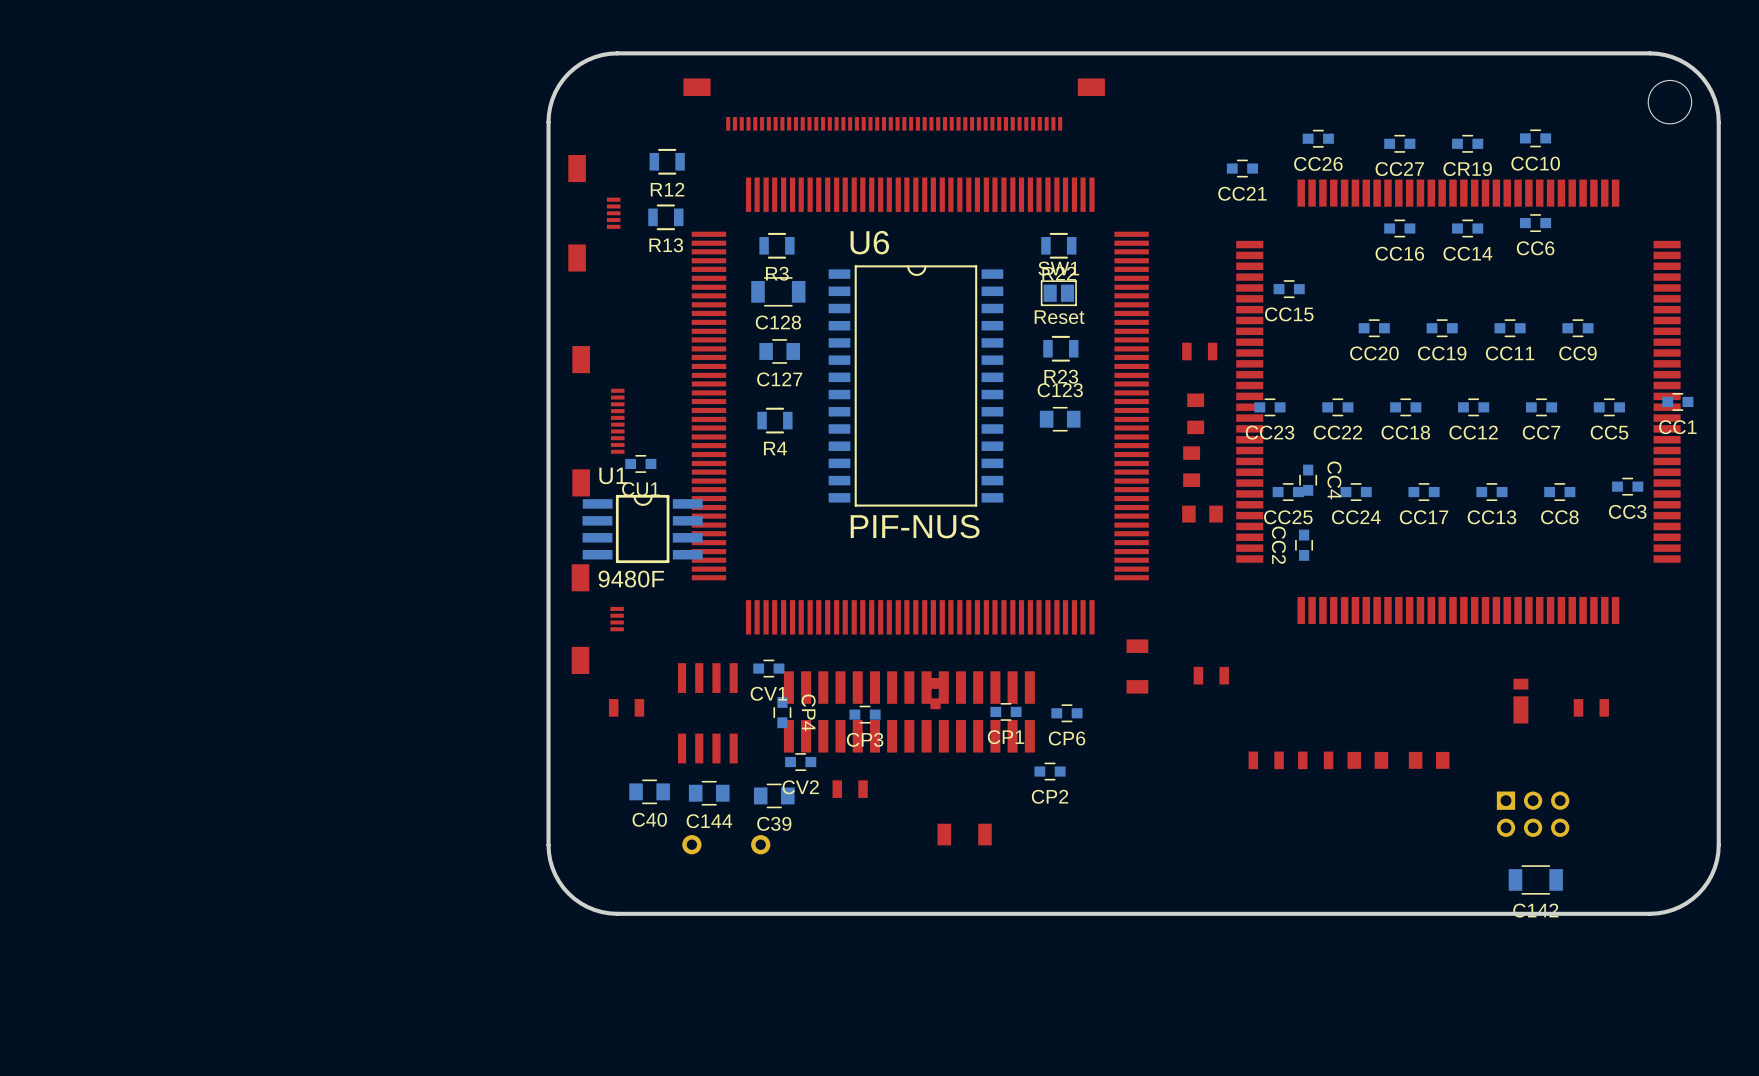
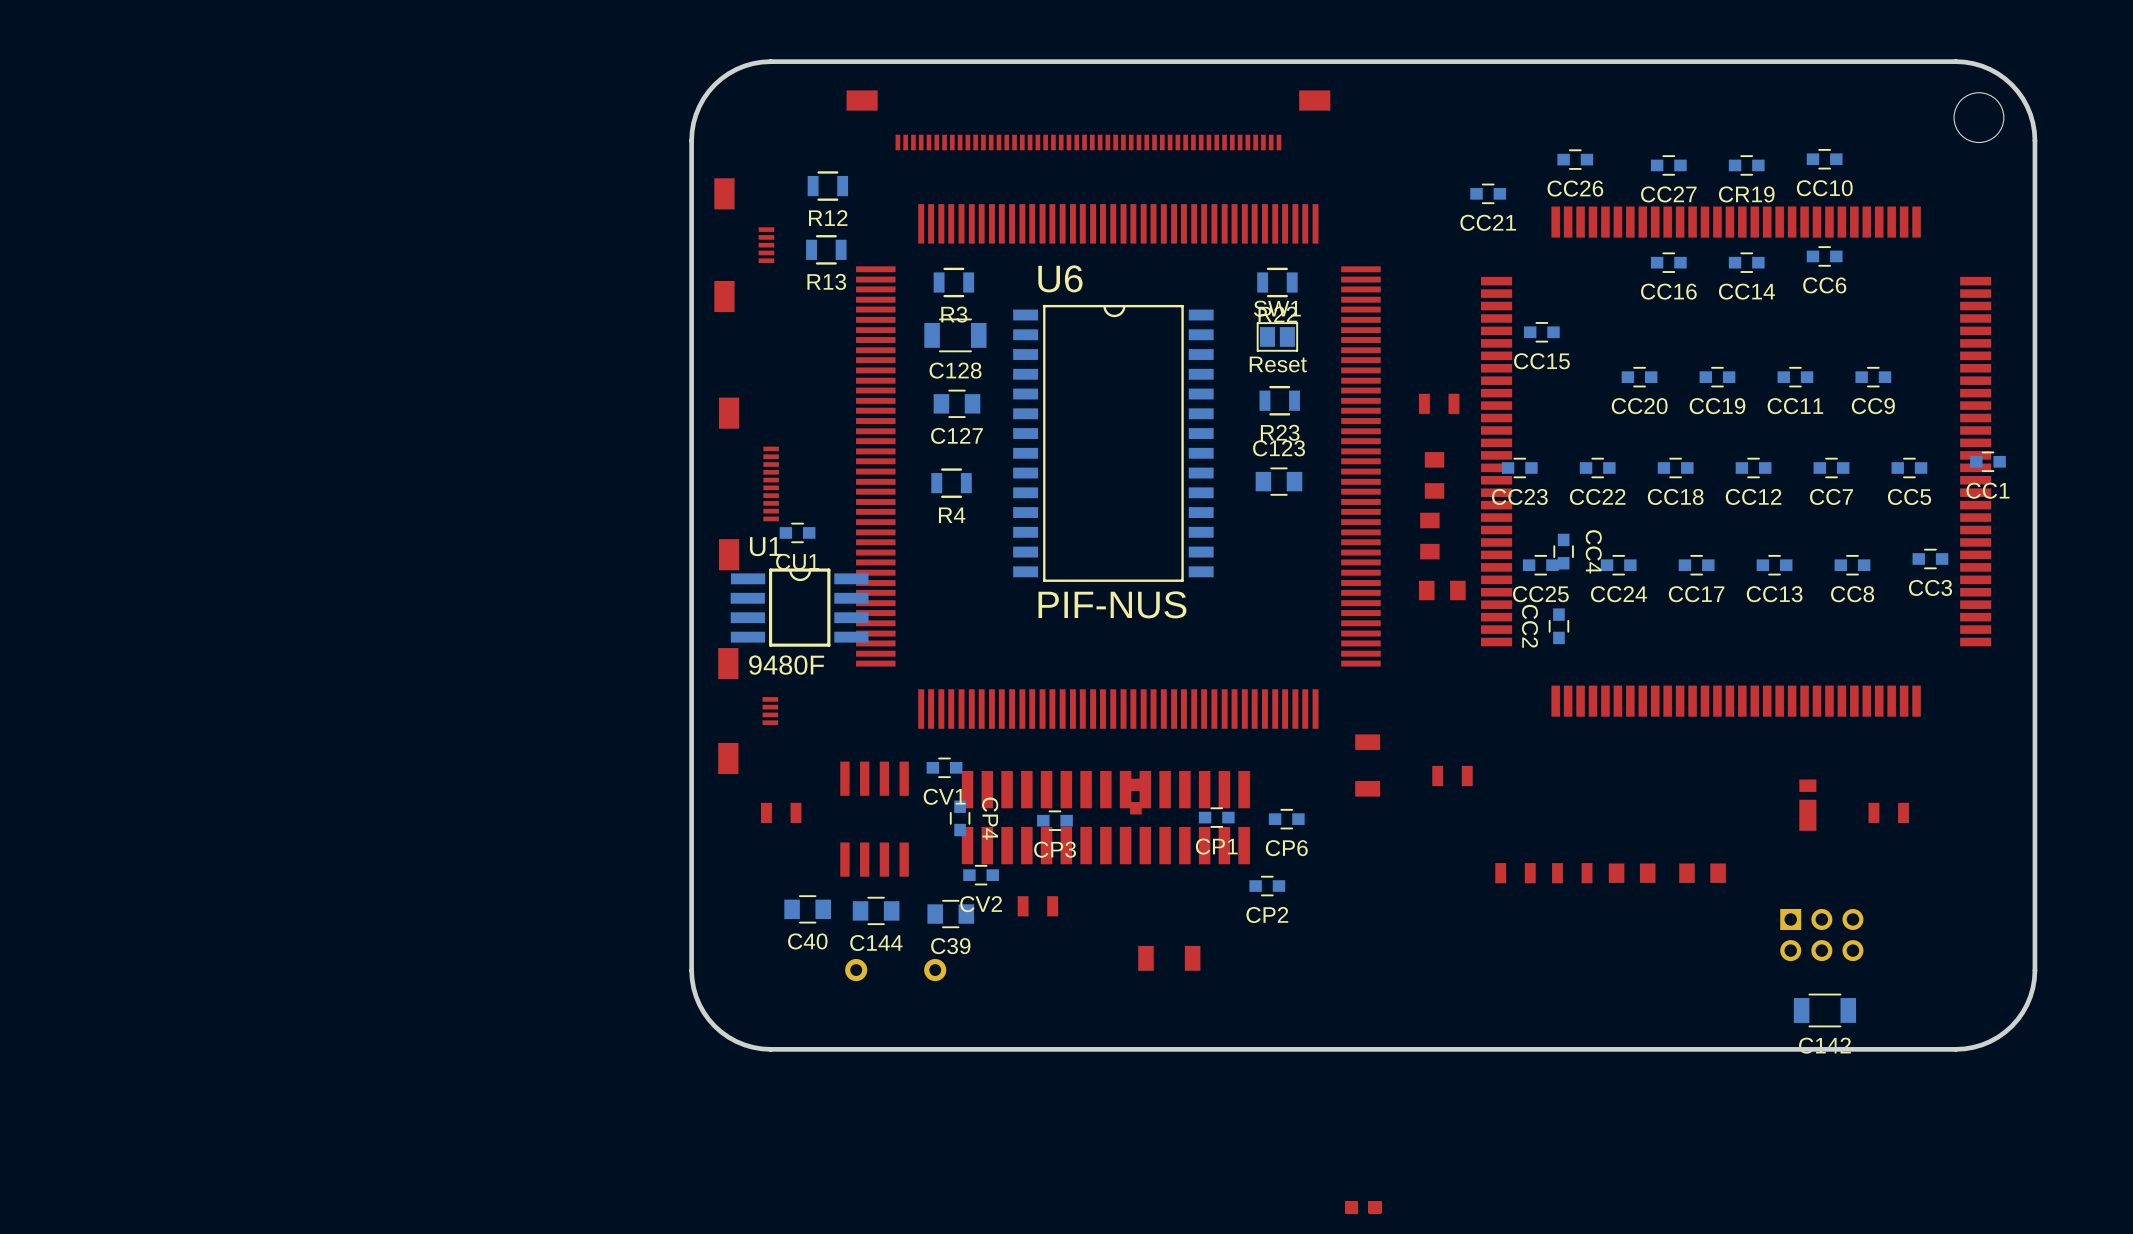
part: none -> (1363, 1207)

